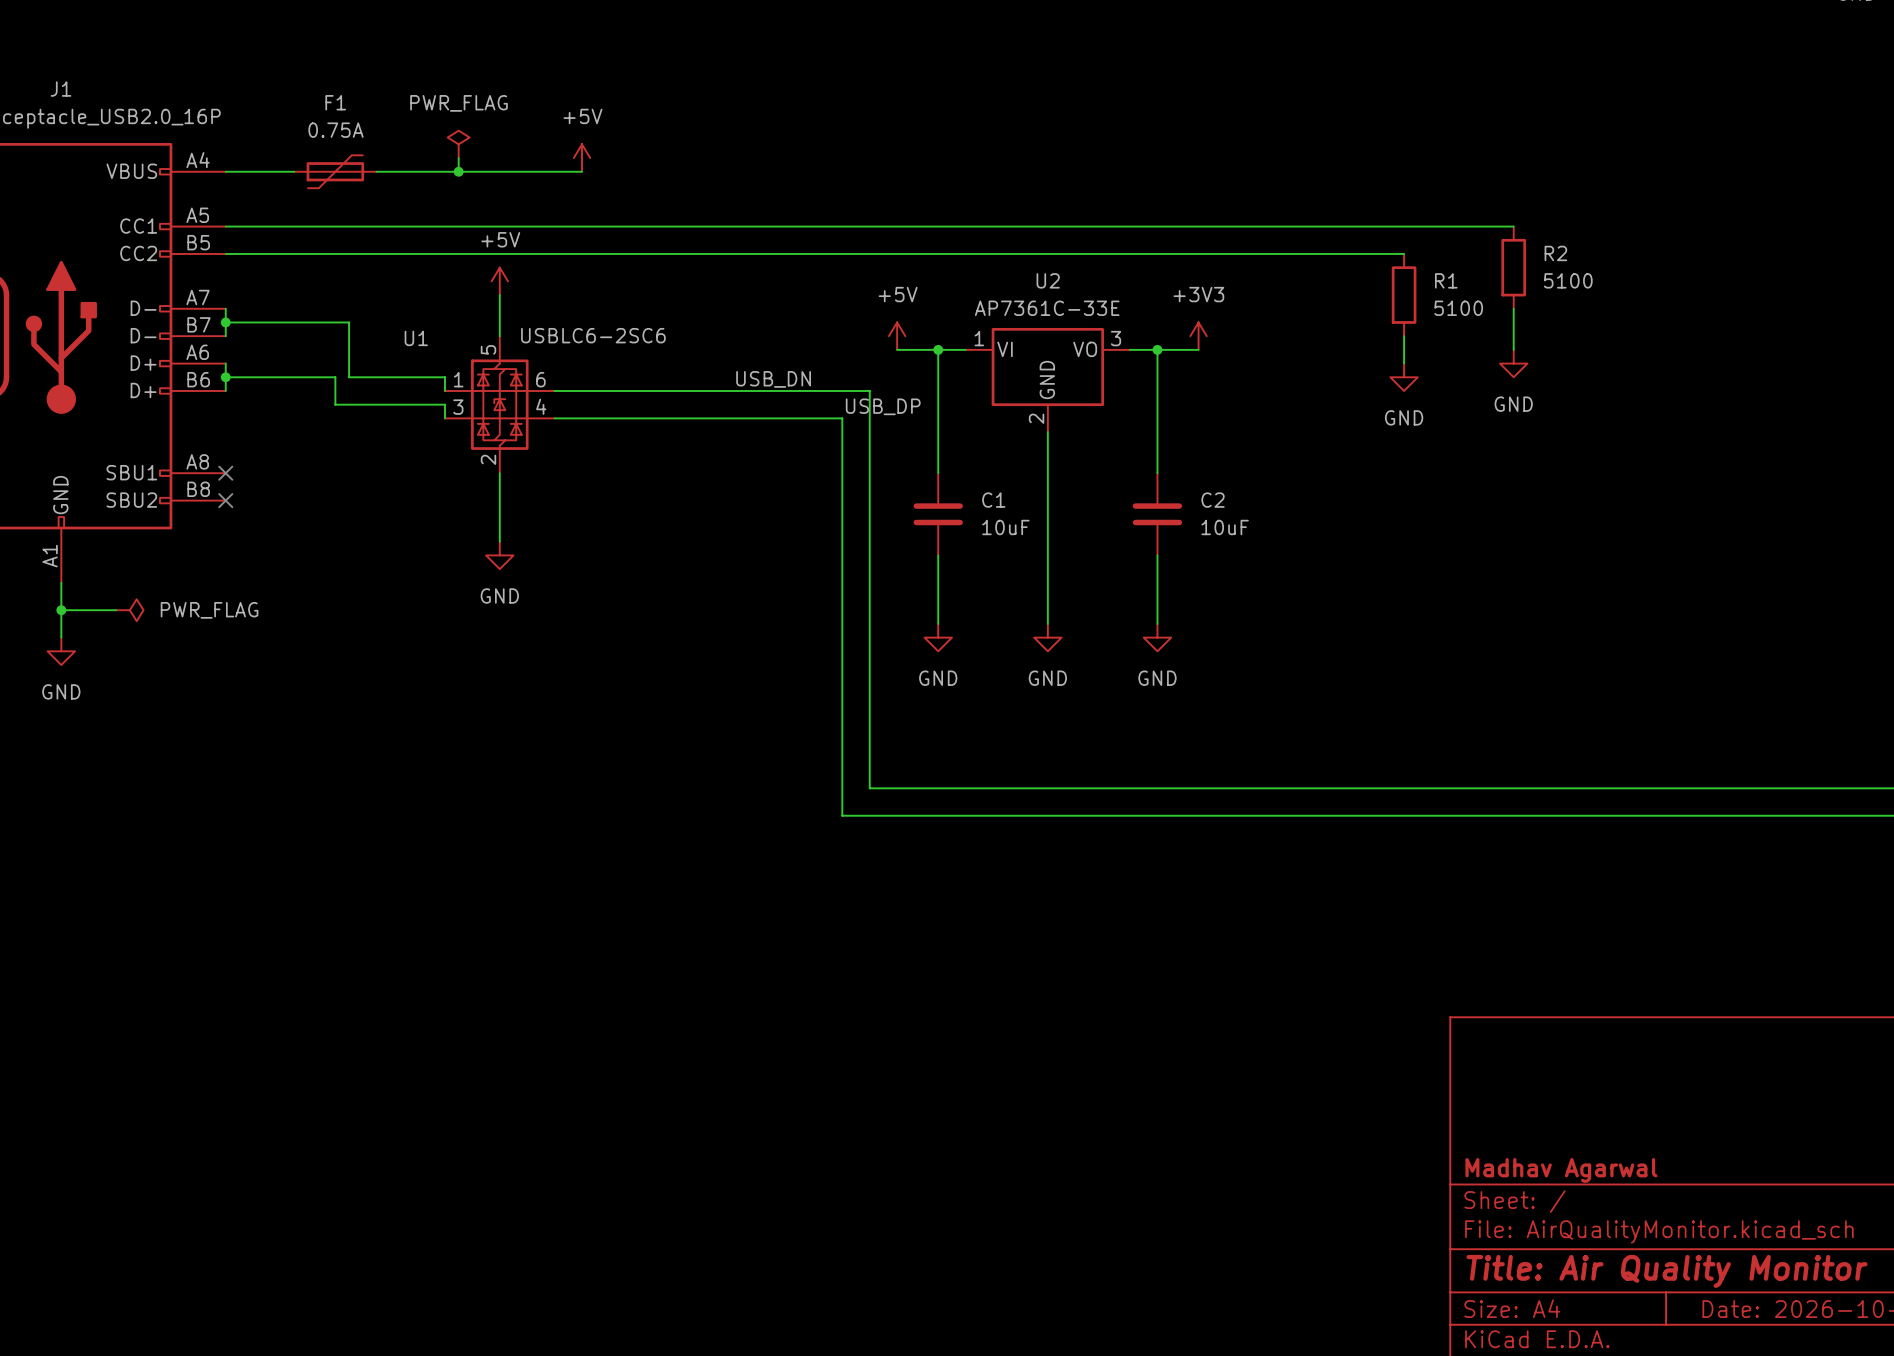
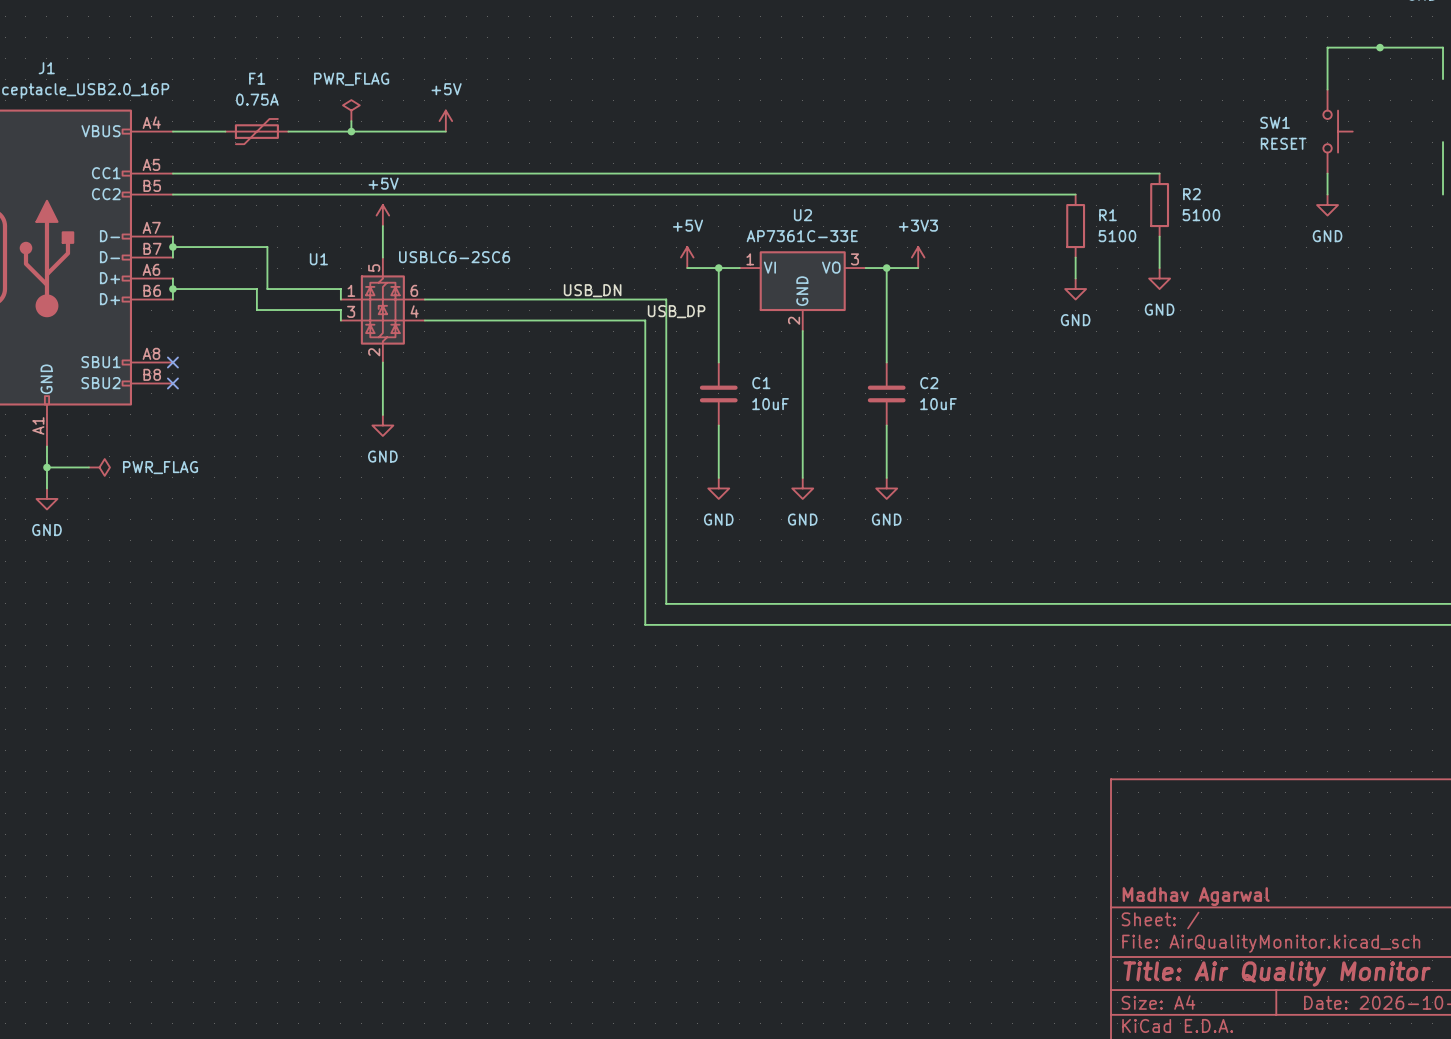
junction: none -> (1380, 47)
wire: none -> (1443, 79) (1443, 47) (1327, 47) (1327, 89)
SW1: none -> RESET (1338, 131)
wire: none -> (1443, 142) (1443, 194)
wire: none -> (1327, 173) (1327, 194)
power symbol: none -> GND (1327, 205)

